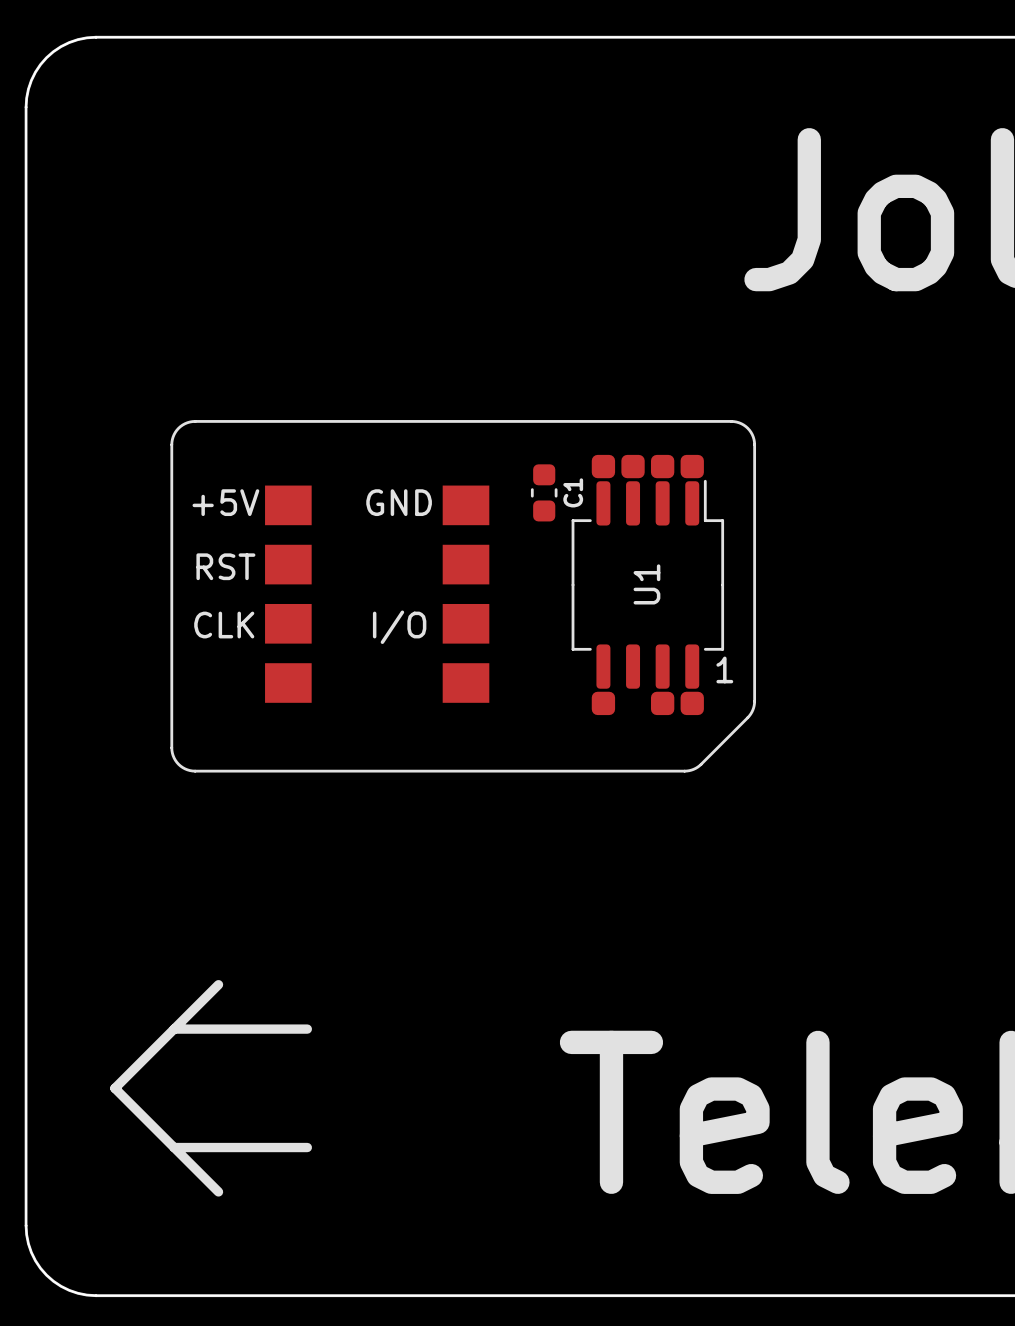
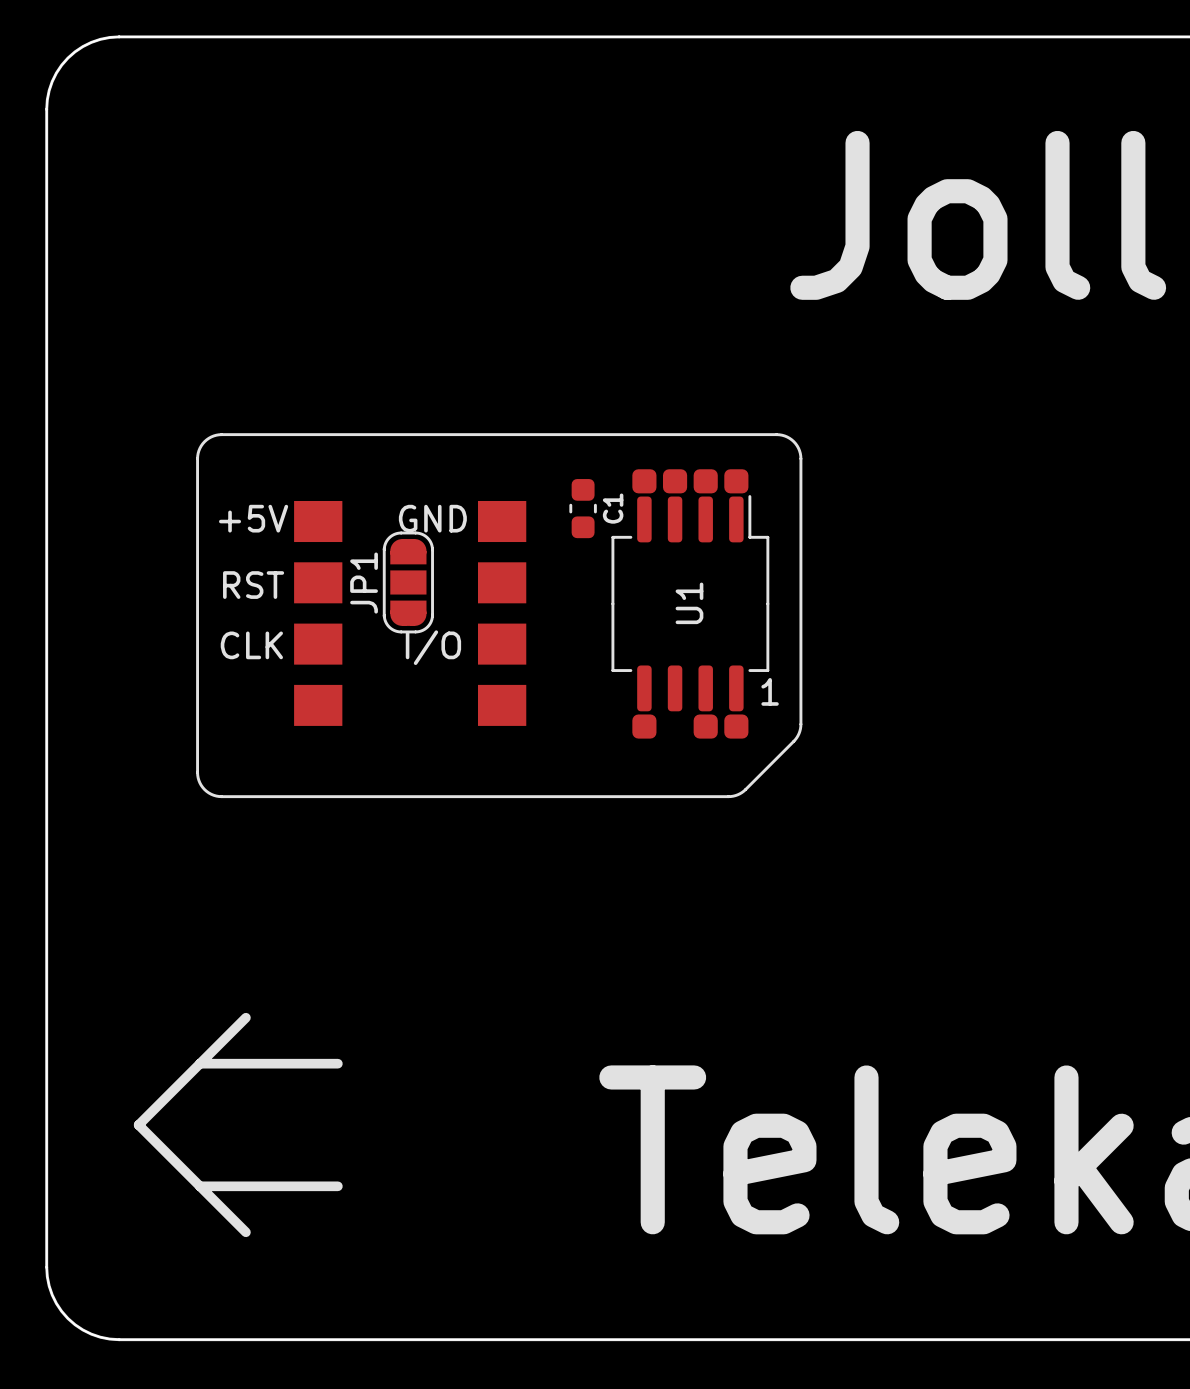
JP1: none -> (408, 582)

